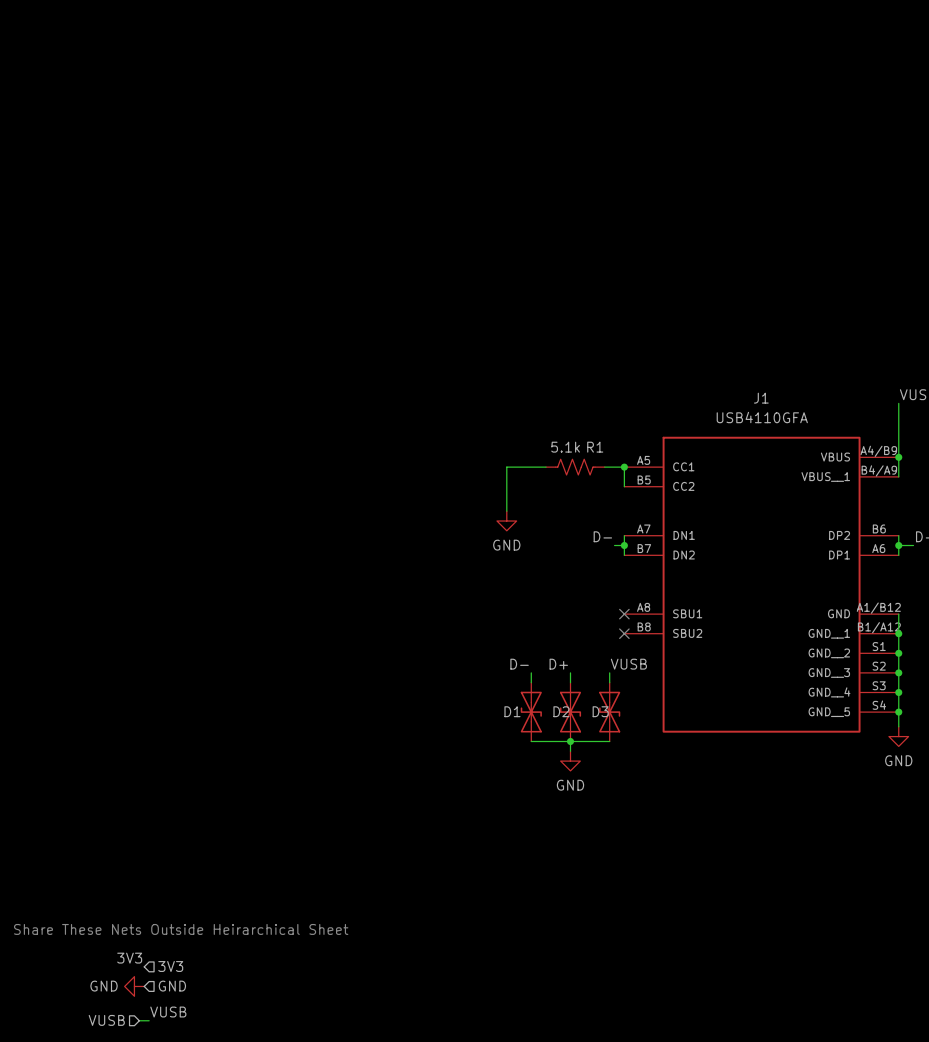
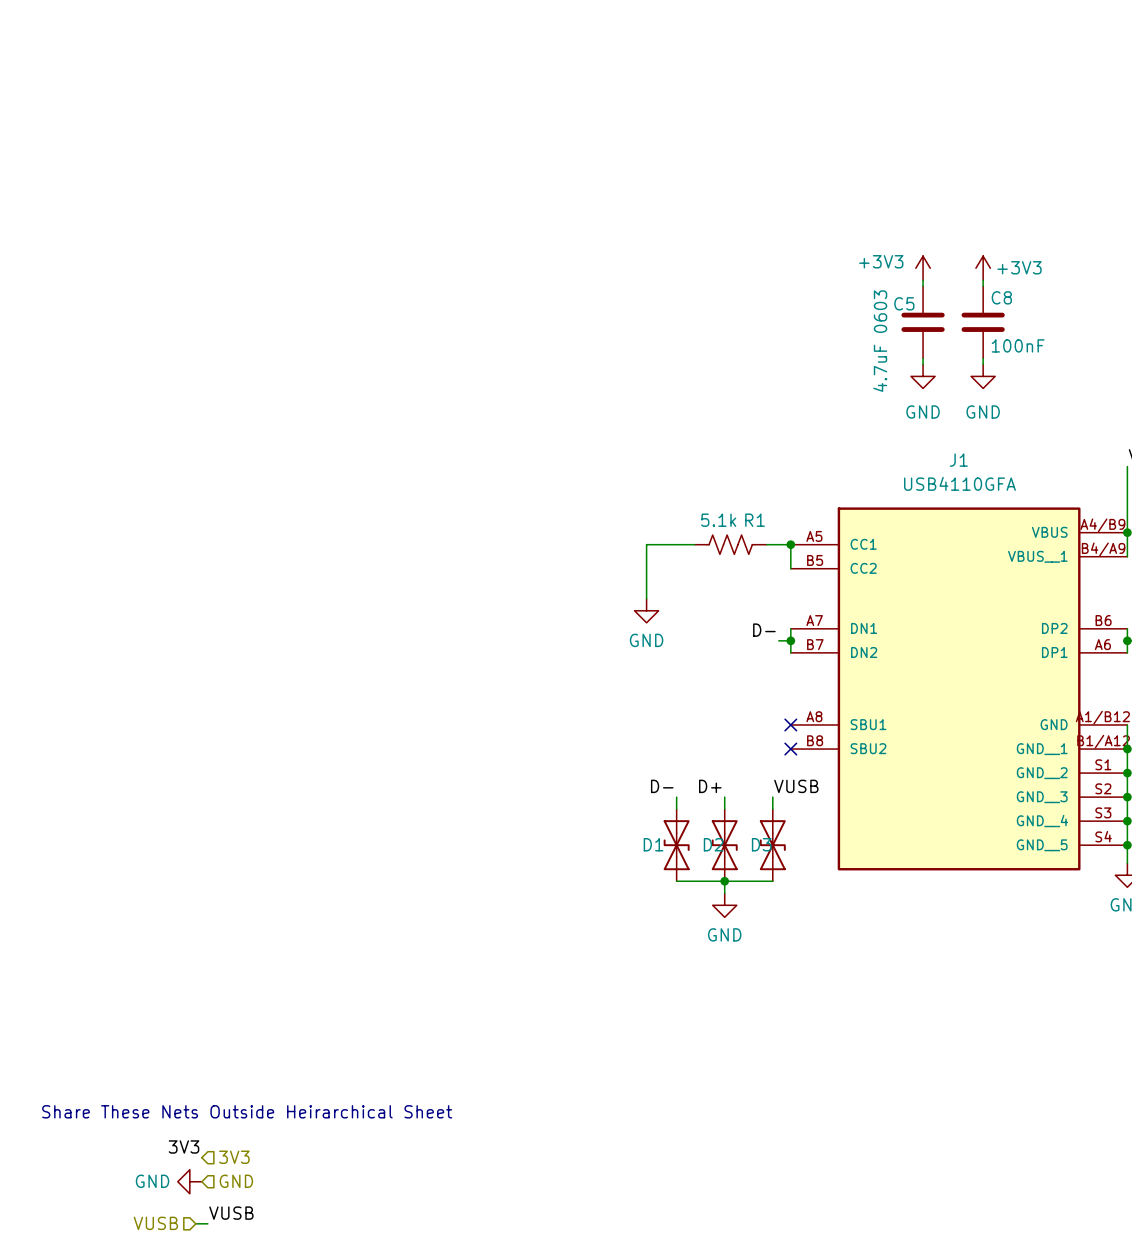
power symbol: none -> +3V3 (923, 268)
power symbol: none -> +3V3 (983, 268)
wire: none -> (923, 280) (923, 286)
wire: none -> (983, 280) (983, 286)
C5: none -> 4.7uF 0603 (923, 322)
C8: none -> 100nF (983, 322)
wire: none -> (923, 358) (923, 364)
wire: none -> (983, 358) (983, 364)
power symbol: none -> GND (923, 376)
power symbol: none -> GND (983, 376)

